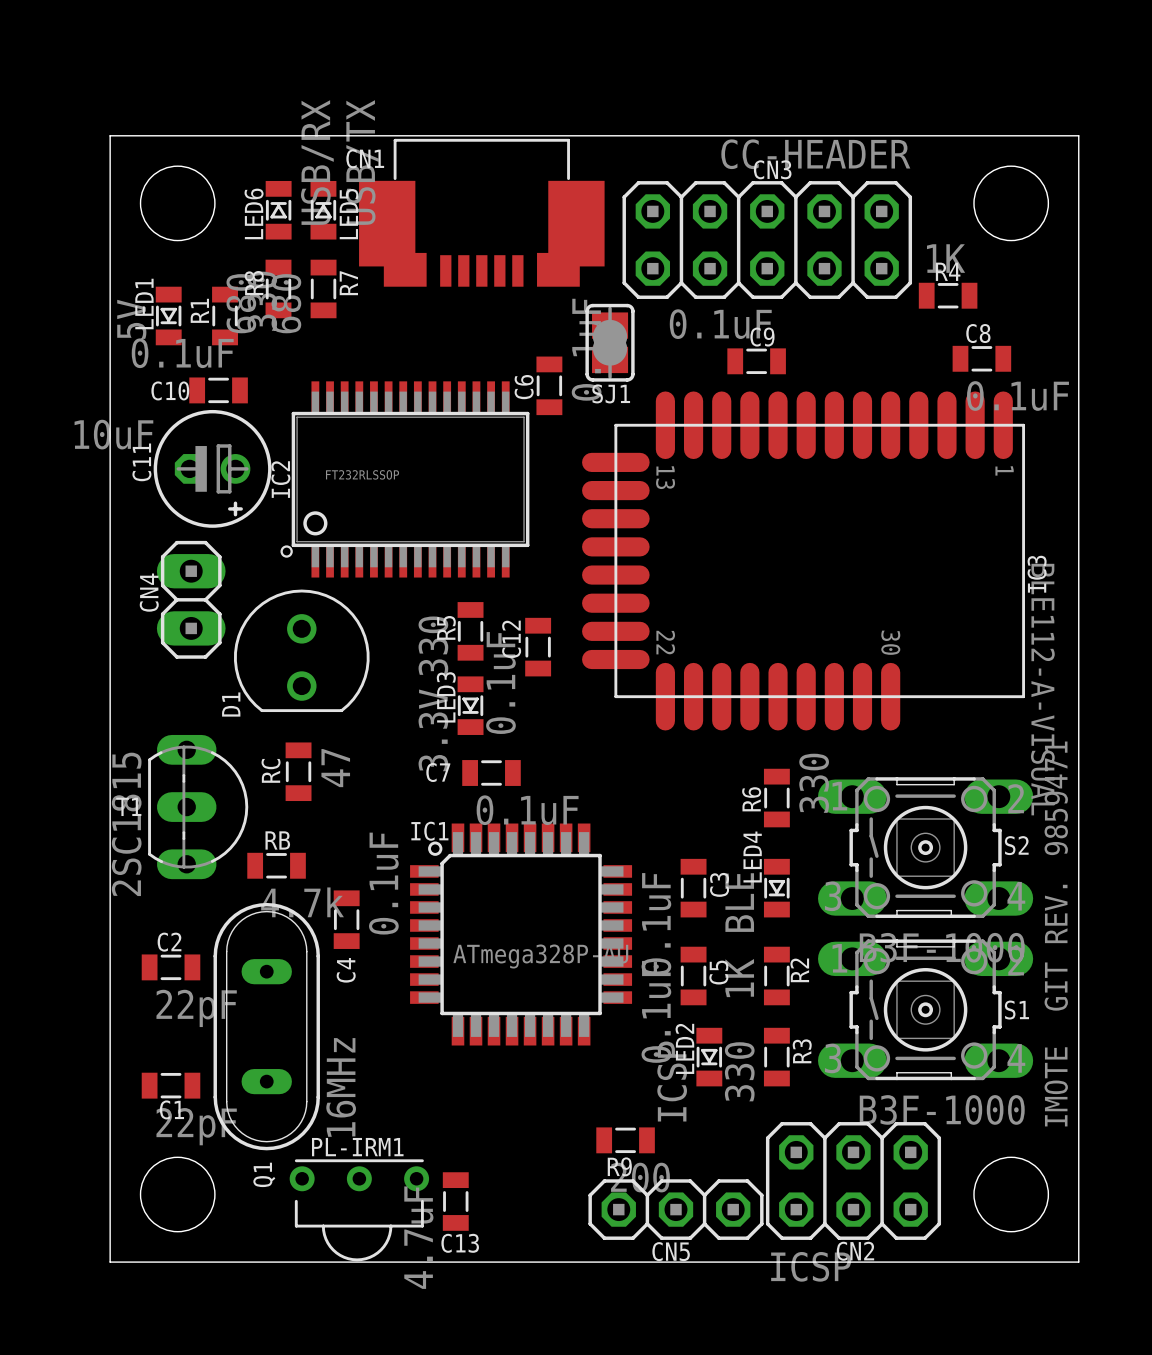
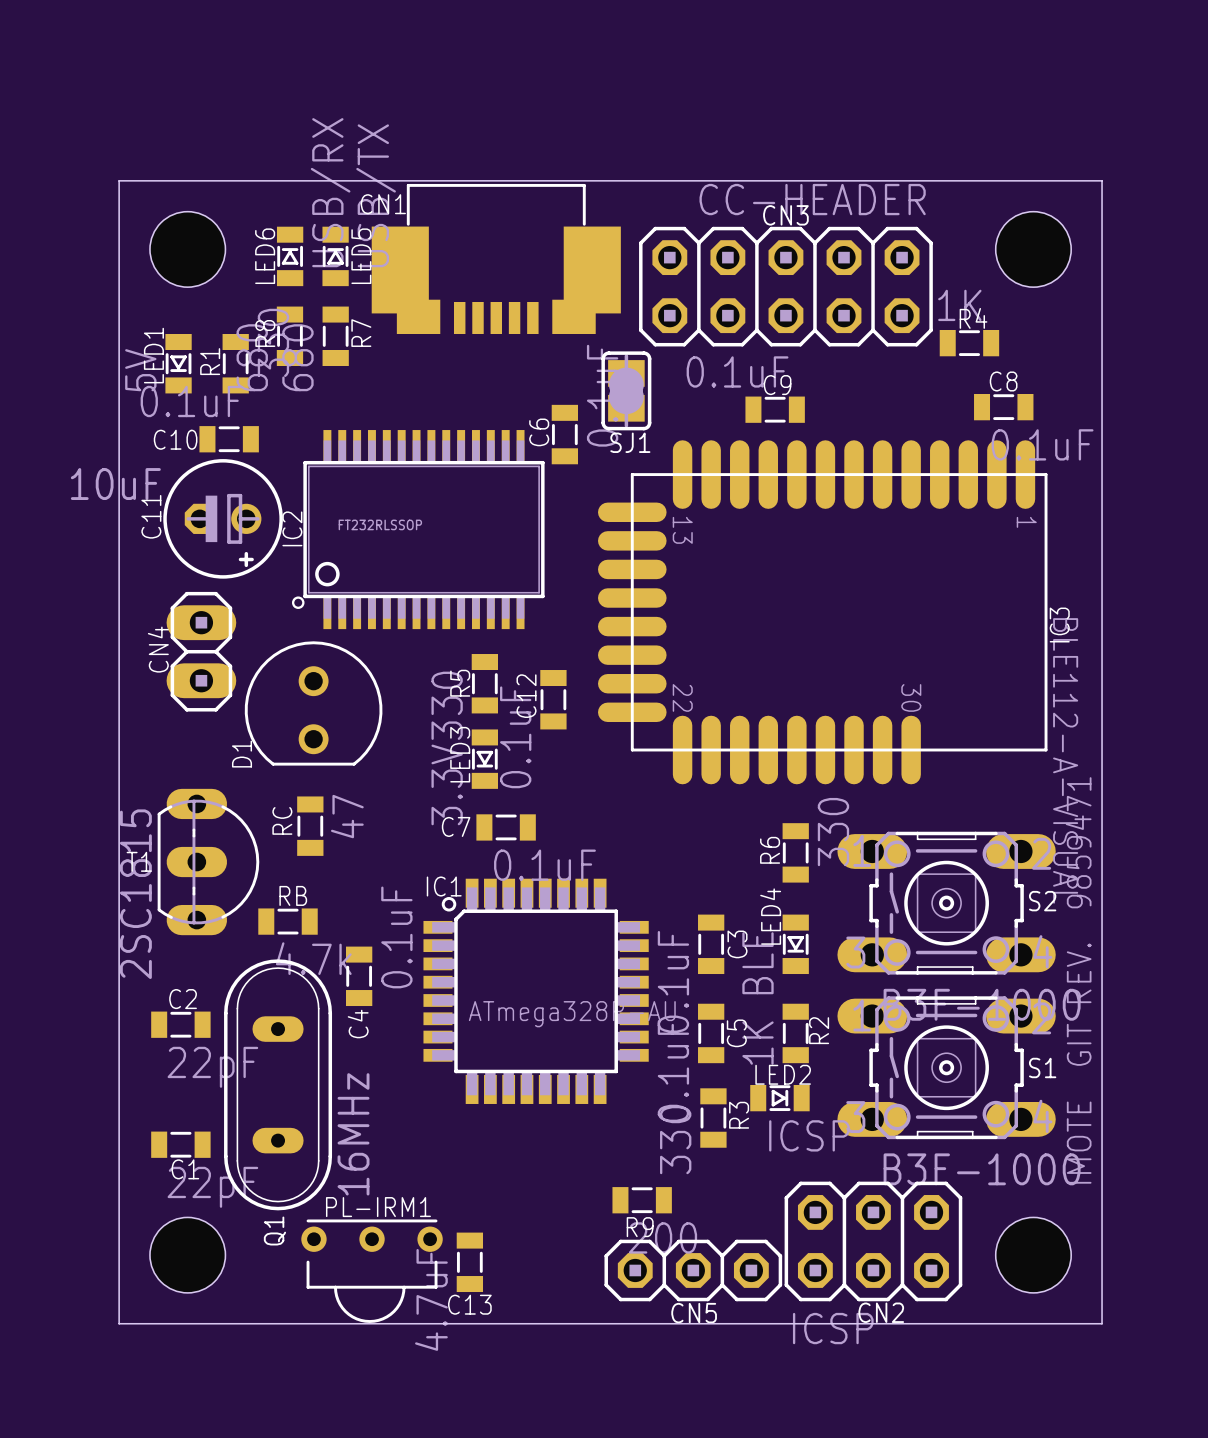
LED2 rotation: 0° (709, 1057) -> 90° counterclockwise (779, 1098)
LED2 position: (709, 1057) -> (779, 1098)
R3 position: (776, 1057) -> (713, 1118)

